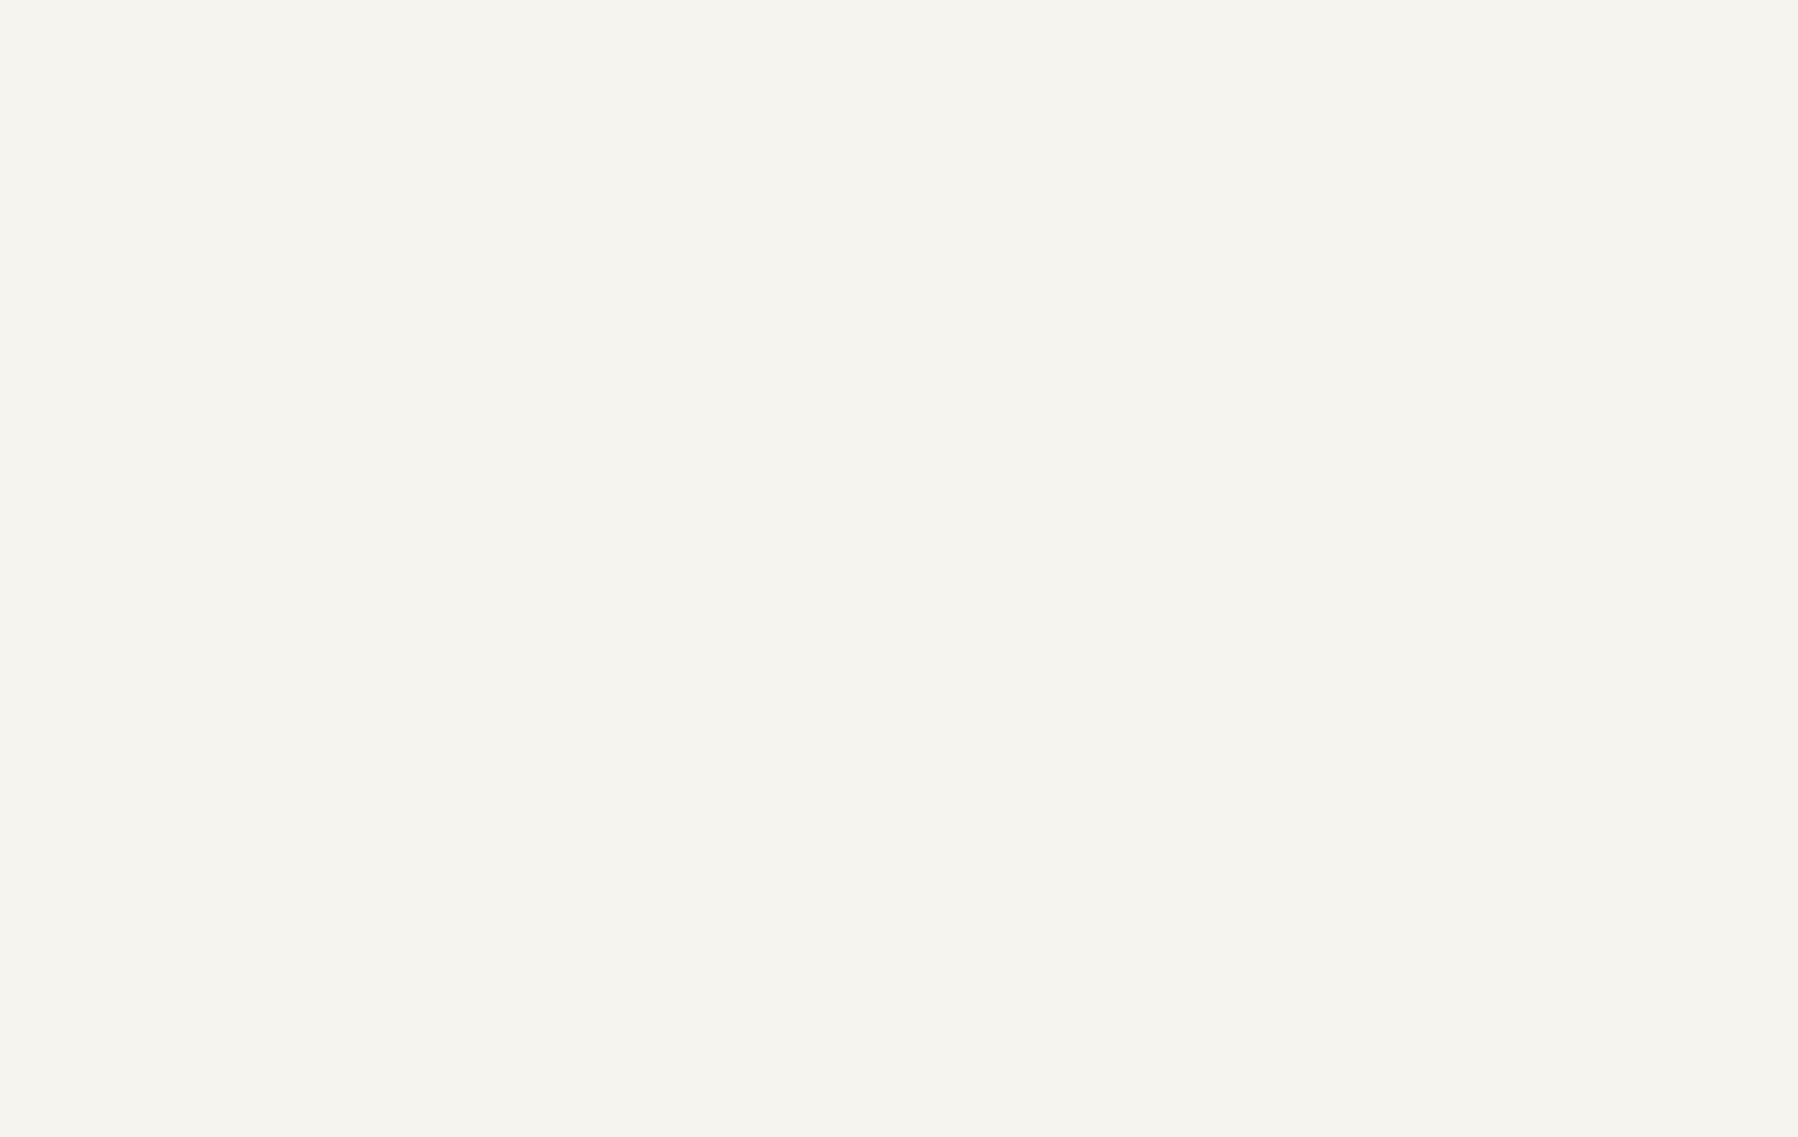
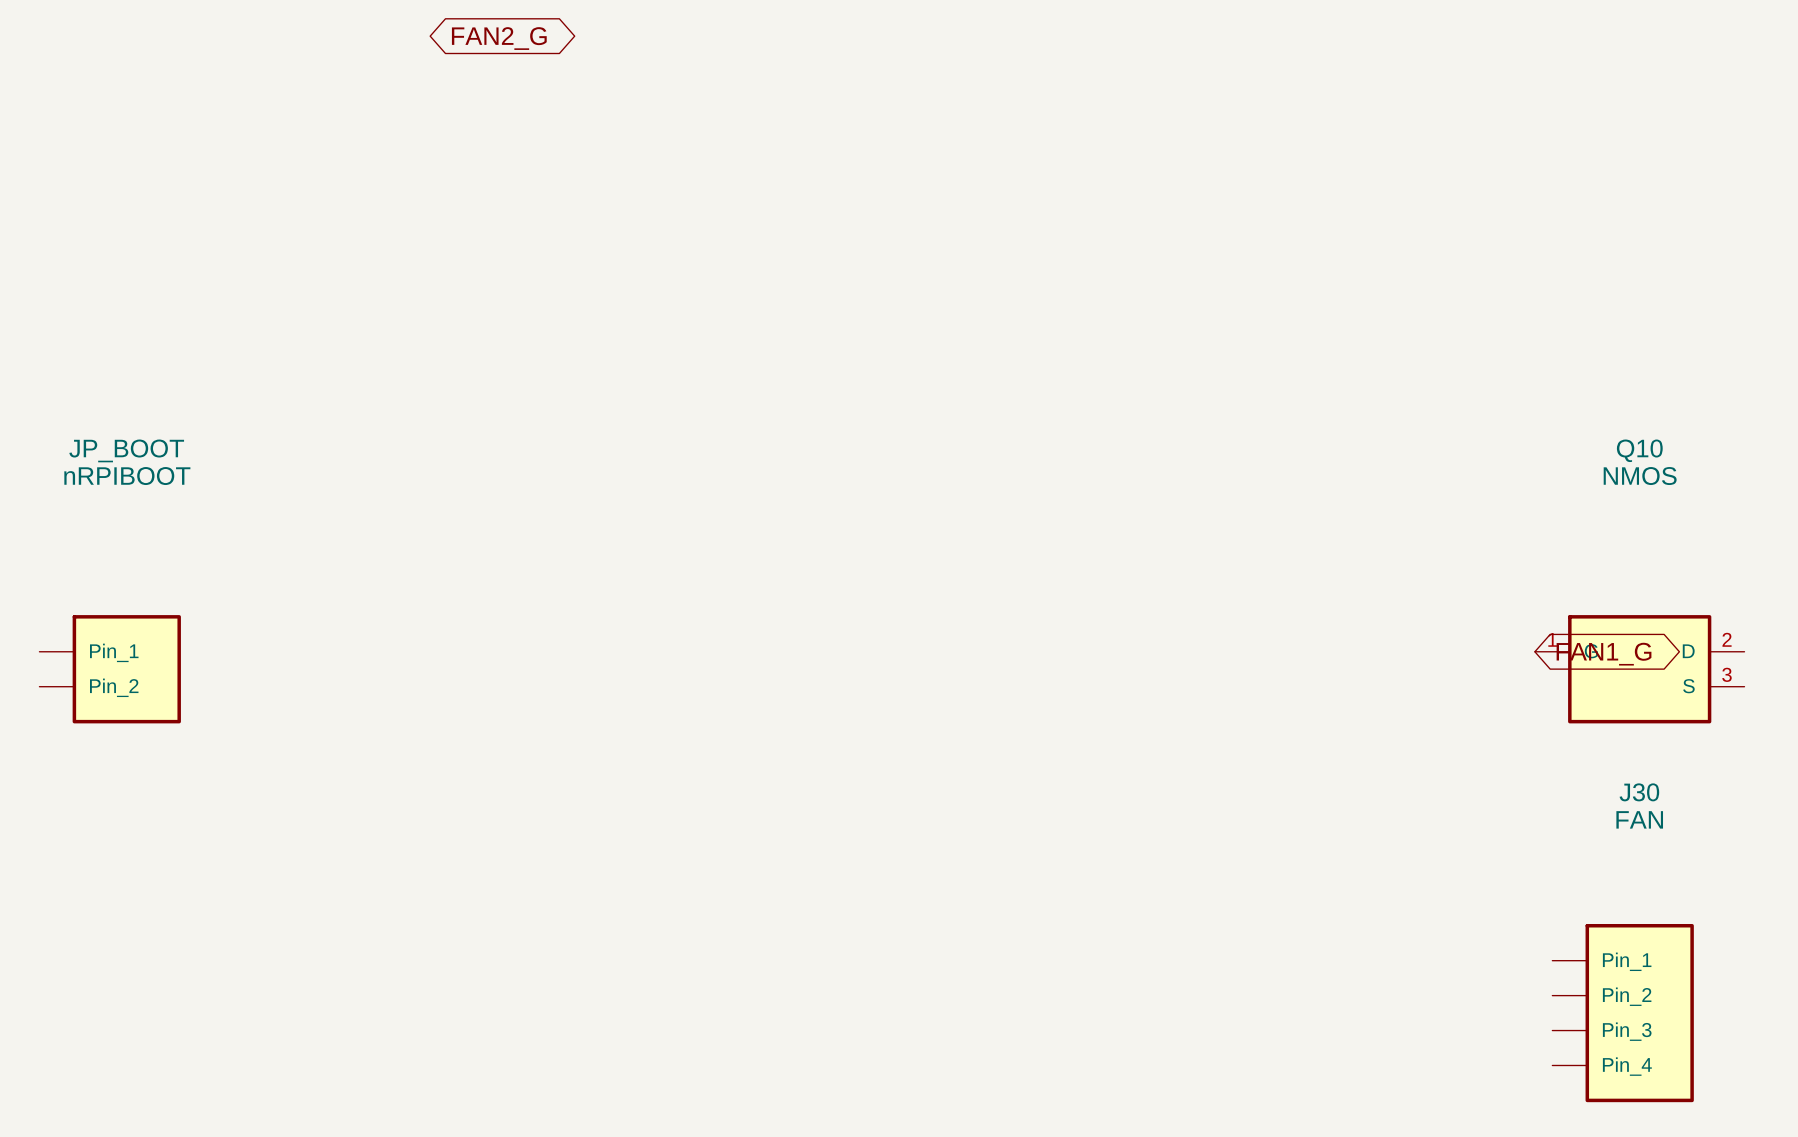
global label: none -> FAN2_G (499, 38)
global label: none -> FAN1_G (1604, 654)
JP_BOOT: none -> nRPIBOOT (110, 669)
Q10: none -> NMOS (1639, 669)
J30: none -> FAN (1623, 1013)

